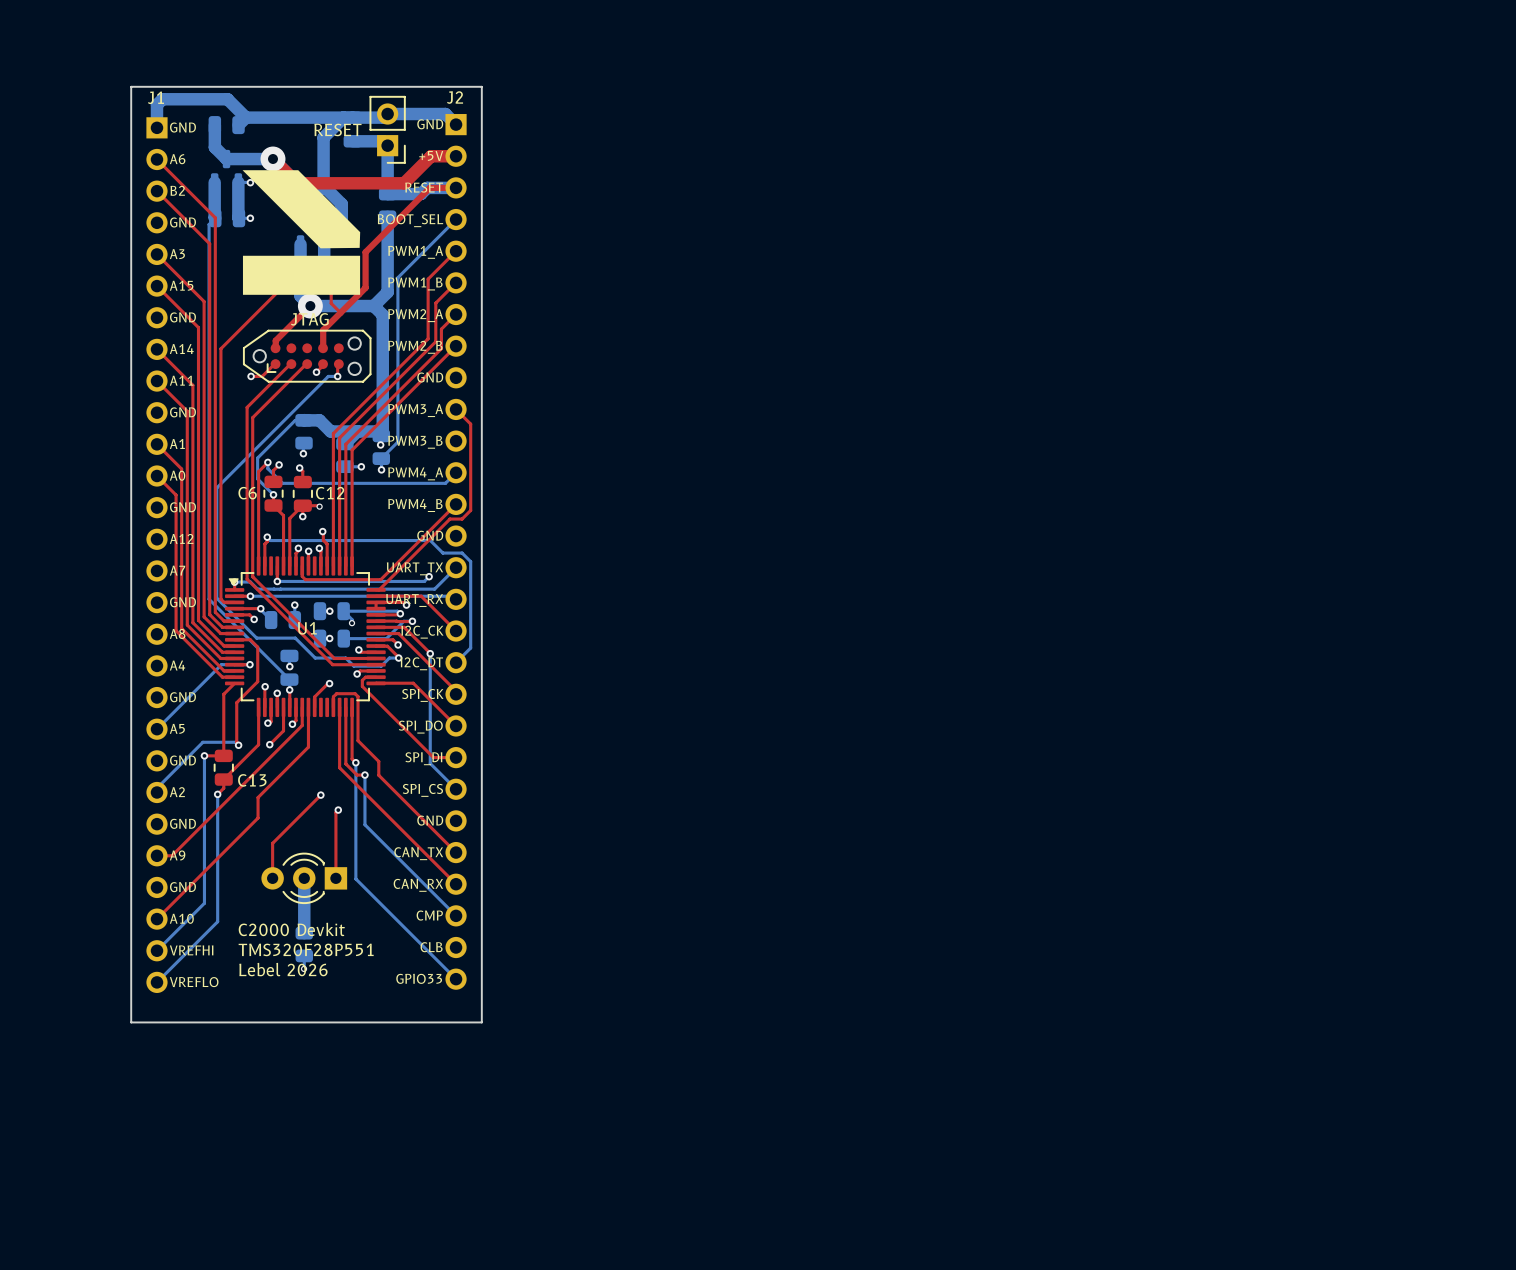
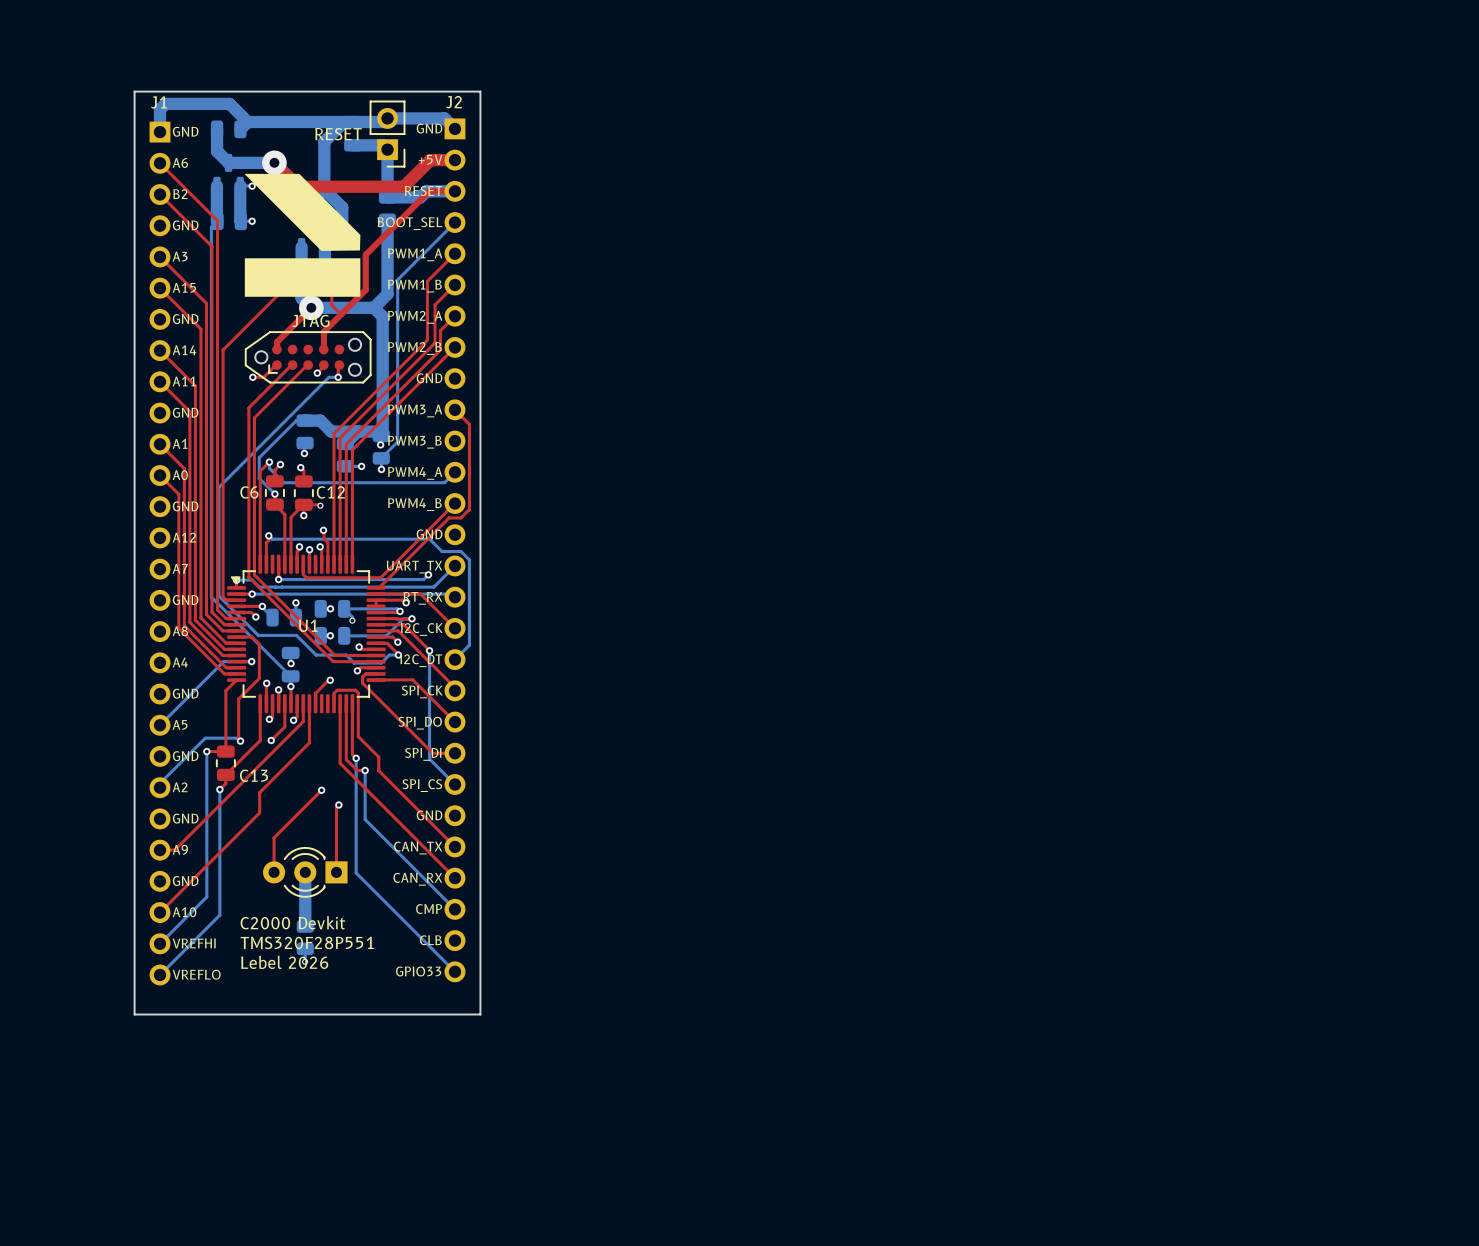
text: UART_RX (414, 600) -> RT_RX (422, 598)

